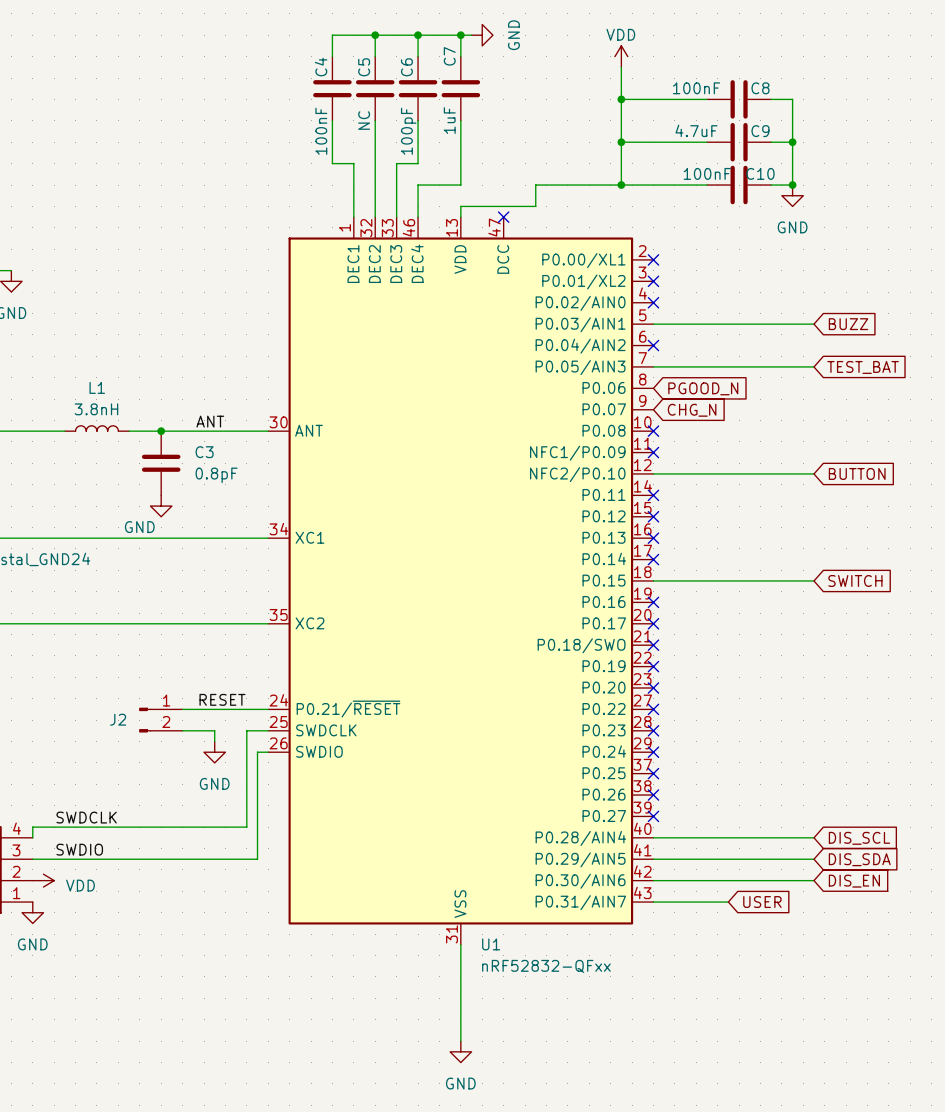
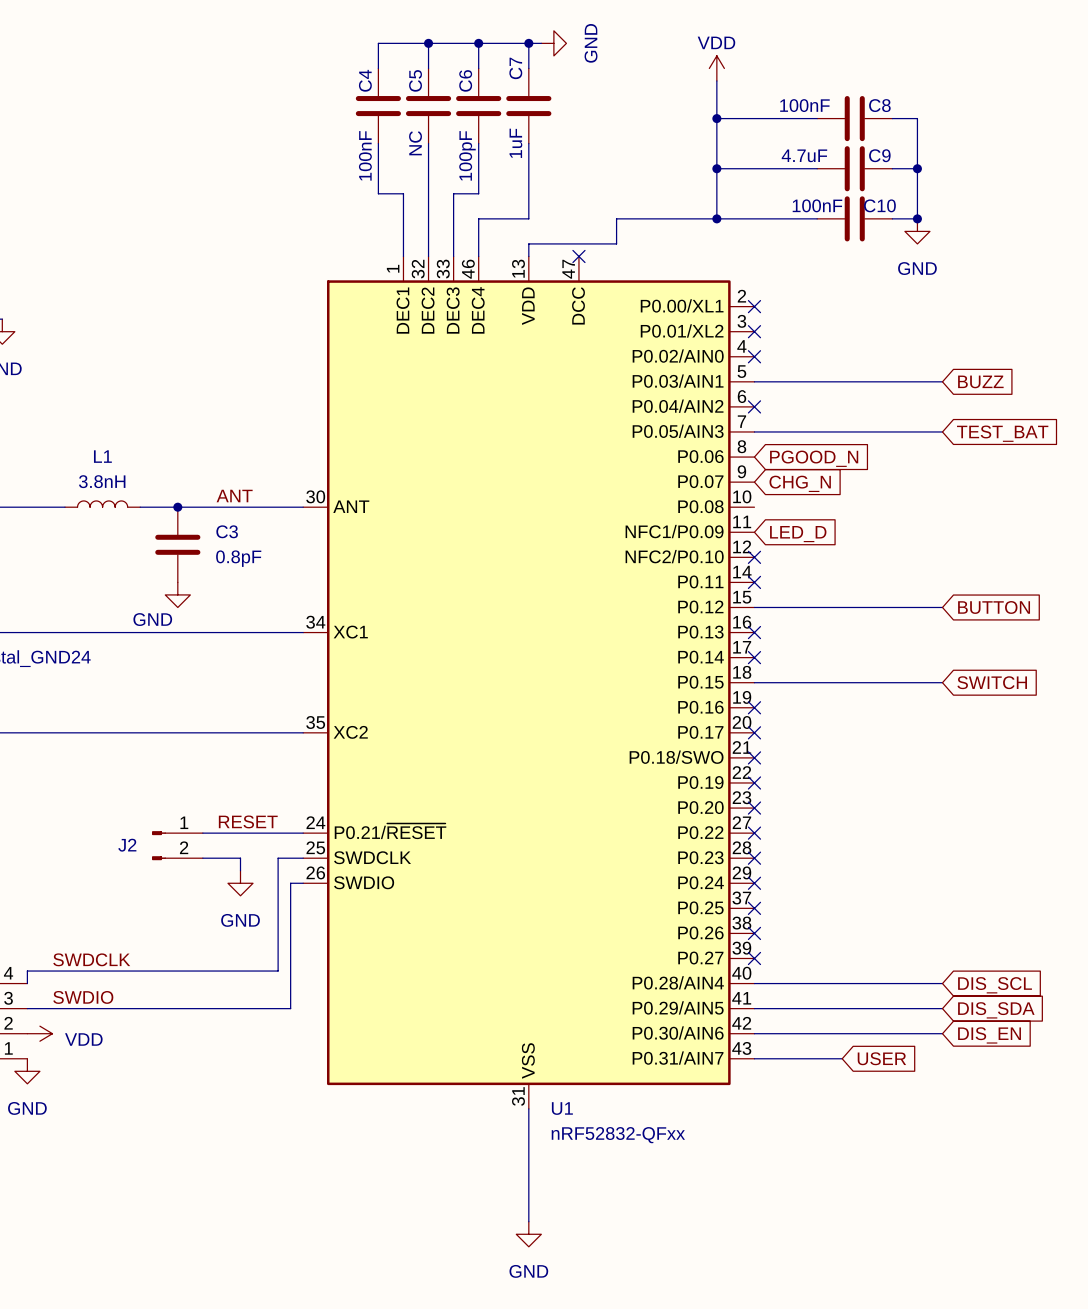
no-connect mark: (653, 431) -> none
no-connect mark: (653, 452) -> none
global label: none -> LED_D (798, 534)
wire: (653, 473) (813, 473) -> (754, 607) (942, 607)
no-connect mark: none -> (754, 557)
global label position: BUTTON (857, 473) -> BUTTON (994, 607)
no-connect mark: (653, 516) -> none

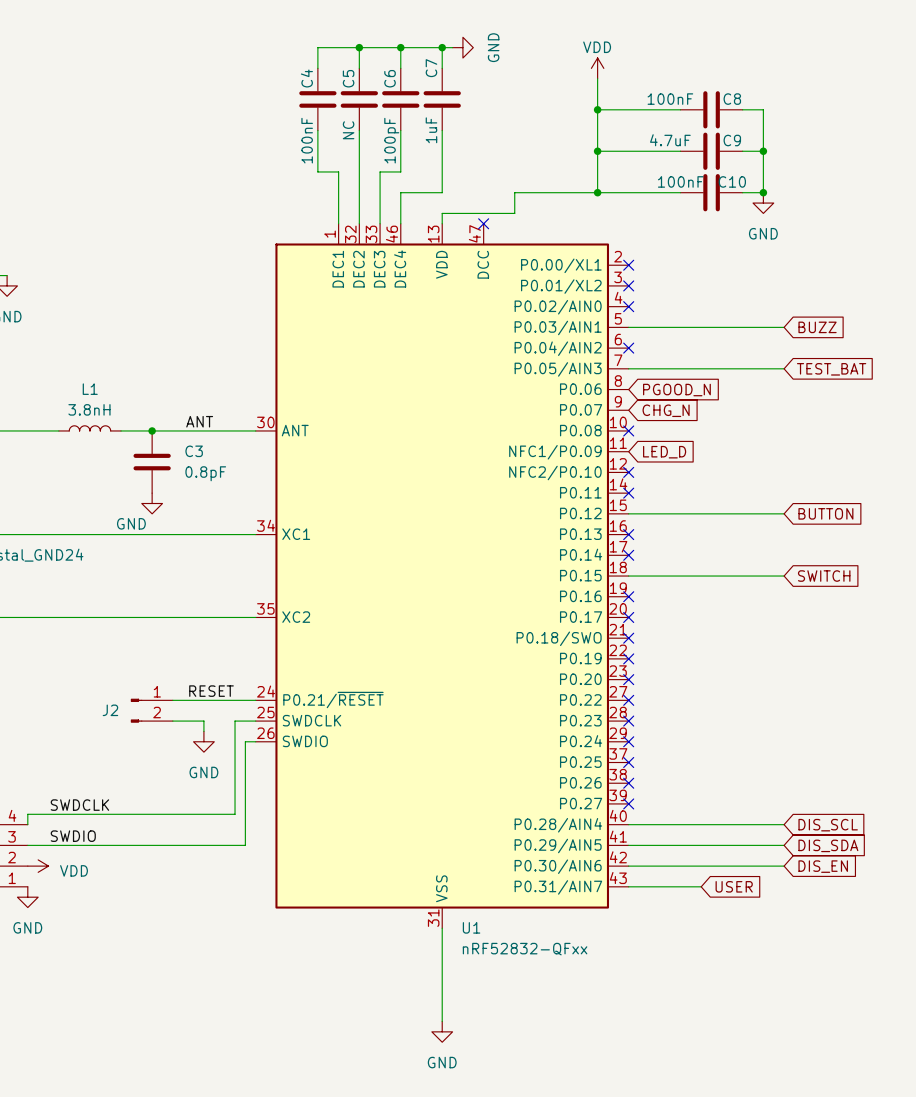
no-connect mark: none -> (628, 430)

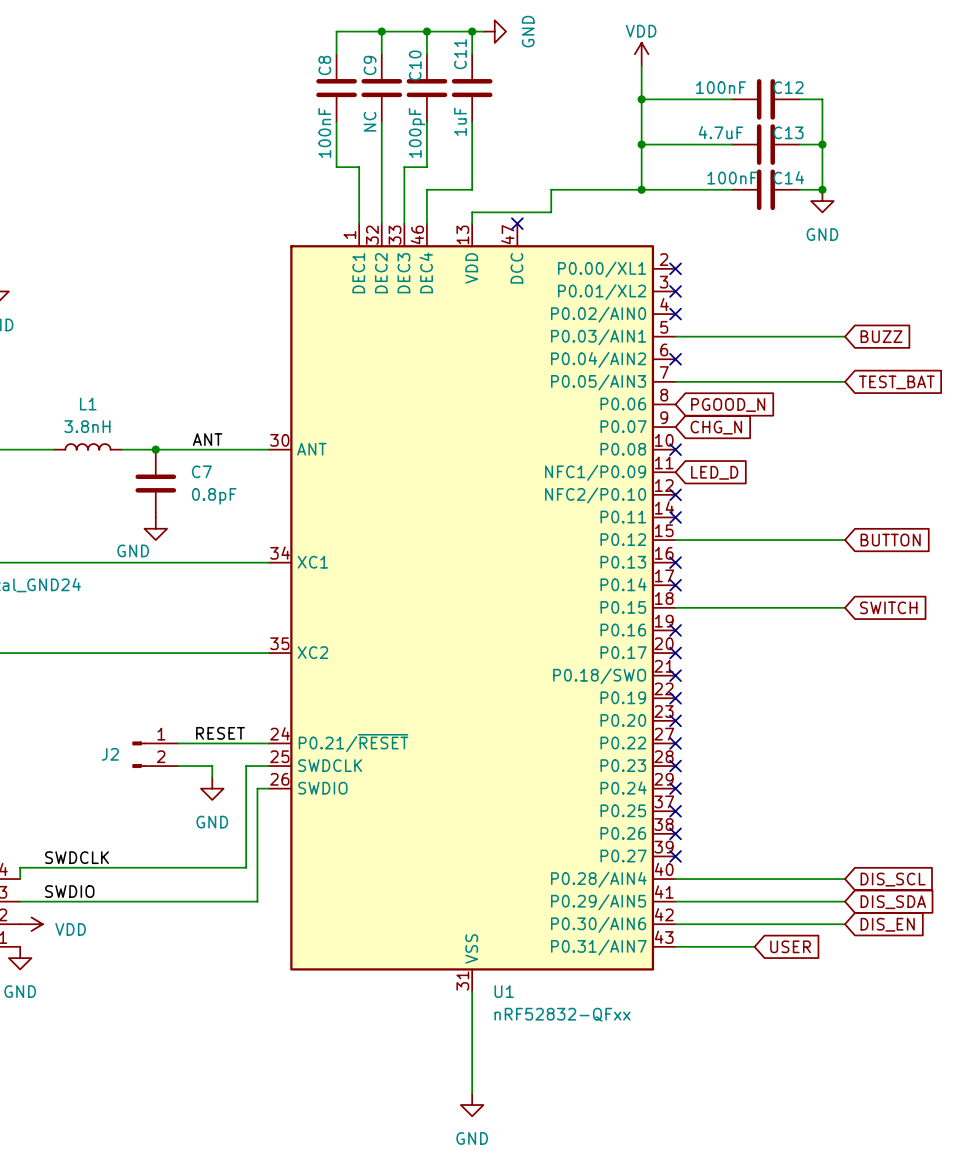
C7 name: C7 (431, 68) -> C11 (460, 54)
C4 name: C4 (306, 78) -> C8 (324, 65)
C5 name: C5 (348, 78) -> C9 (370, 65)
C6 name: C6 (390, 78) -> C10 (415, 65)
C8 name: C8 (732, 99) -> C12 (788, 87)
C9 name: C9 (732, 140) -> C13 (788, 132)
C10 name: C10 (732, 181) -> C14 (788, 177)
C3 name: C3 (194, 451) -> C7 (201, 471)

